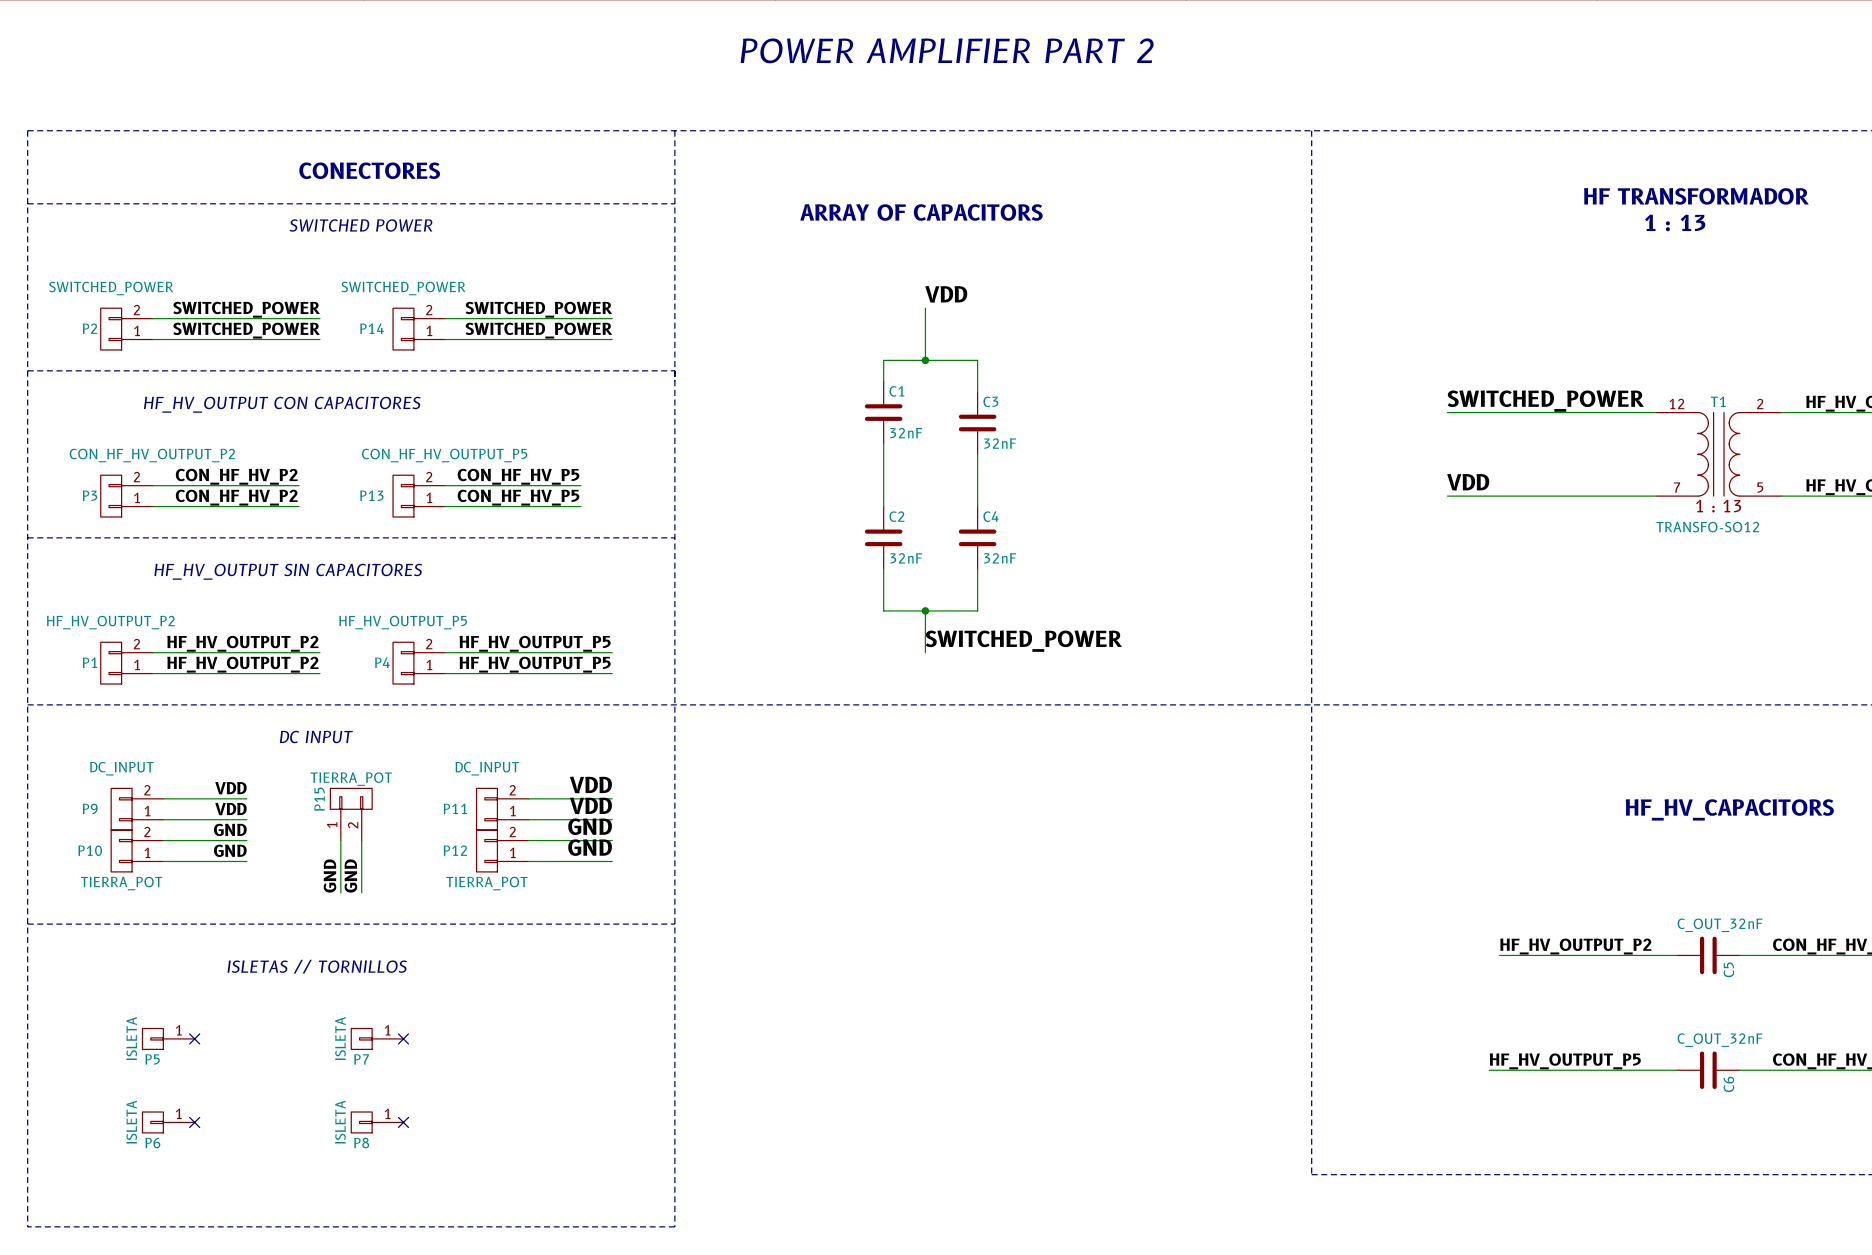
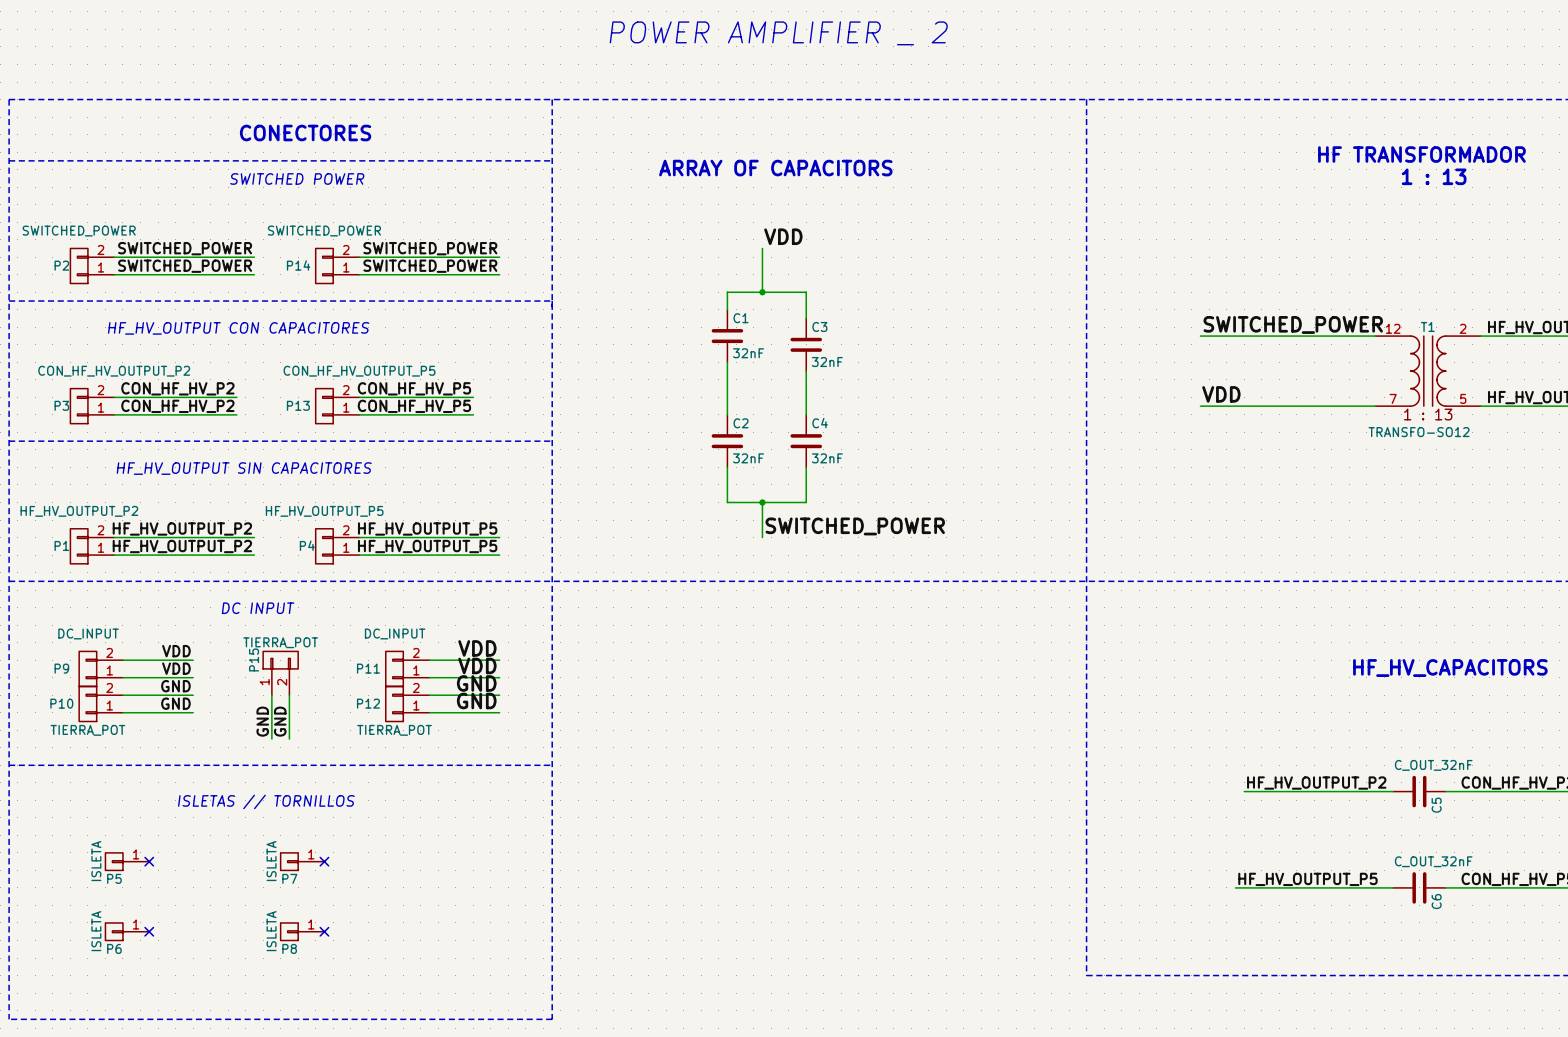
text: POWER AMPLIFIER PART 2 (947, 50) -> POWER AMPLIFIER _ 2 (778, 33)

